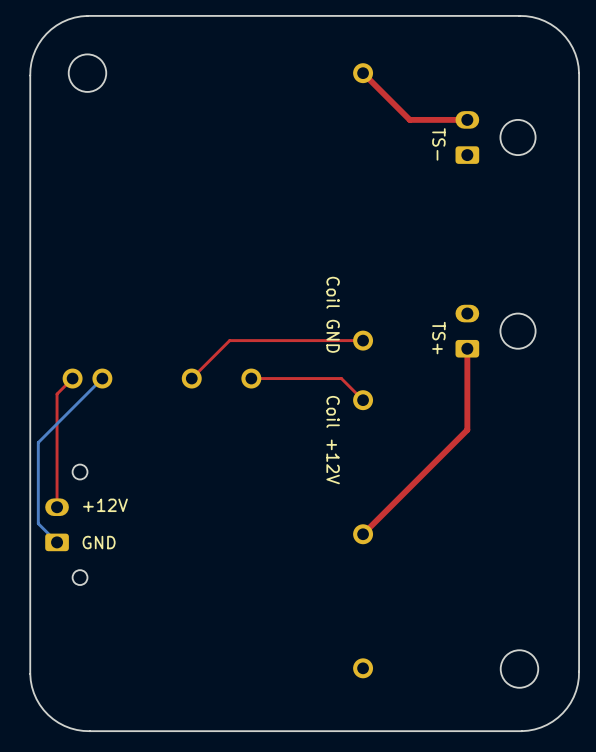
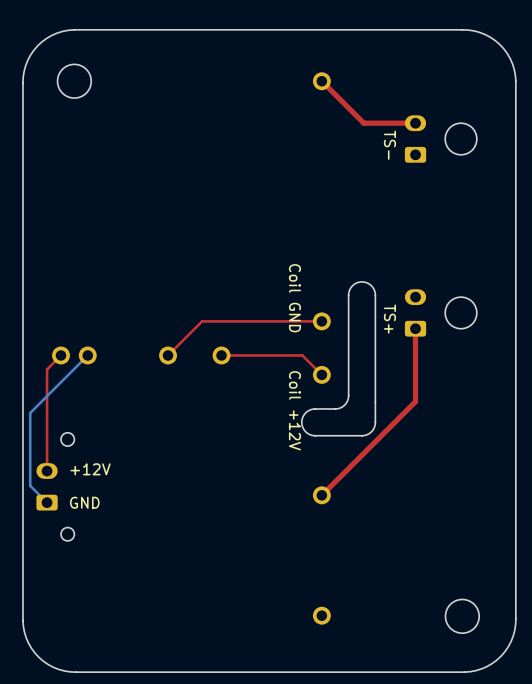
board edge: none -> (375, 295) (374, 428) (370, 432) (363, 435) (310, 434) (304, 430) (301, 424) (305, 412) (313, 409) (339, 408) (345, 403) (348, 398) (349, 290) (355, 283) (365, 282) (372, 287) (375, 295)

